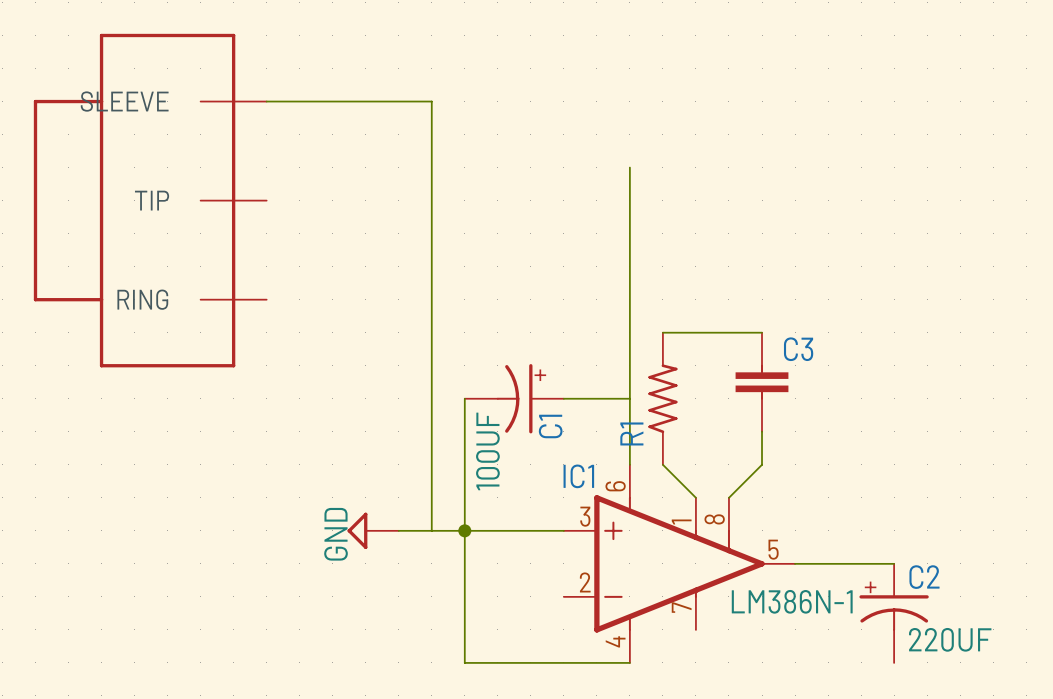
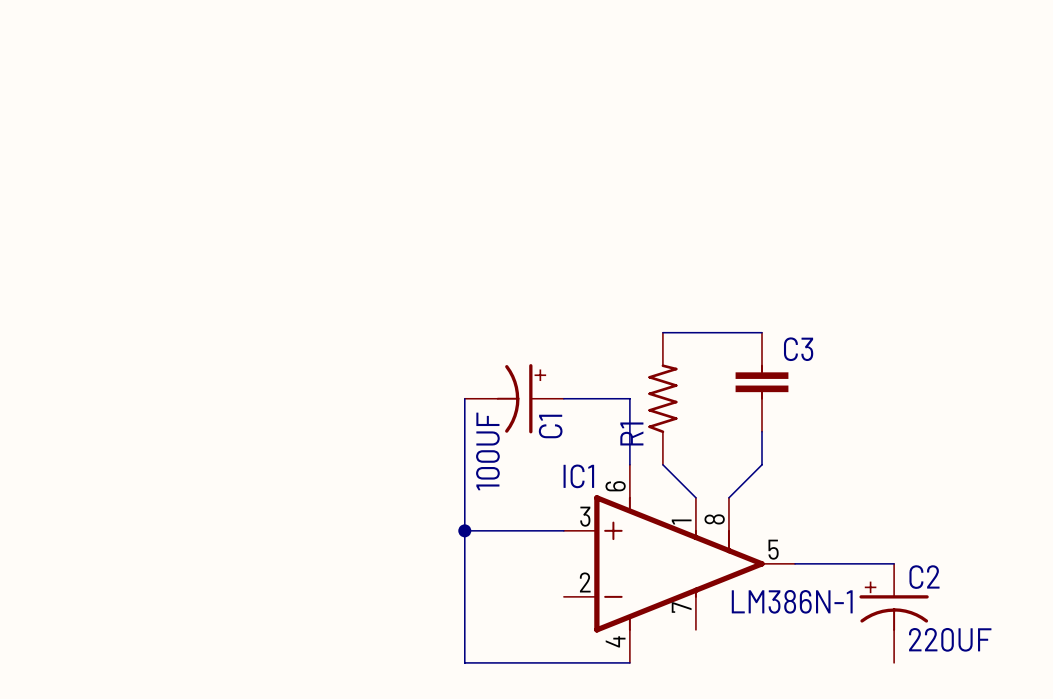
wire: (266, 101) (431, 101) (431, 530) -> none
wire: (629, 167) (629, 398) -> none
part: (150, 200) -> none
power symbol: GND (373, 530) -> none
wire: (398, 530) (464, 530) -> none

